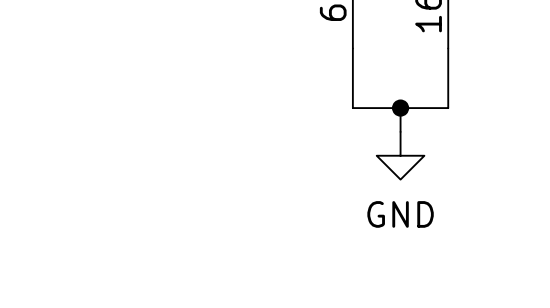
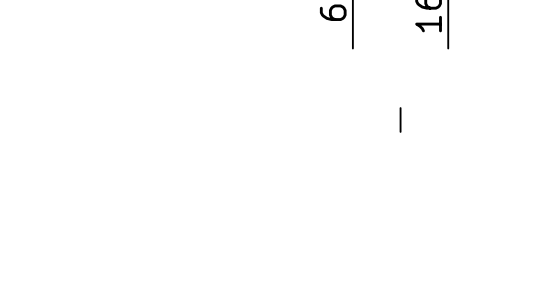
wire: (352, 48) (352, 108) (448, 108) (448, 48) -> none
junction: (400, 108) -> none
power symbol: GND (400, 155) -> none

